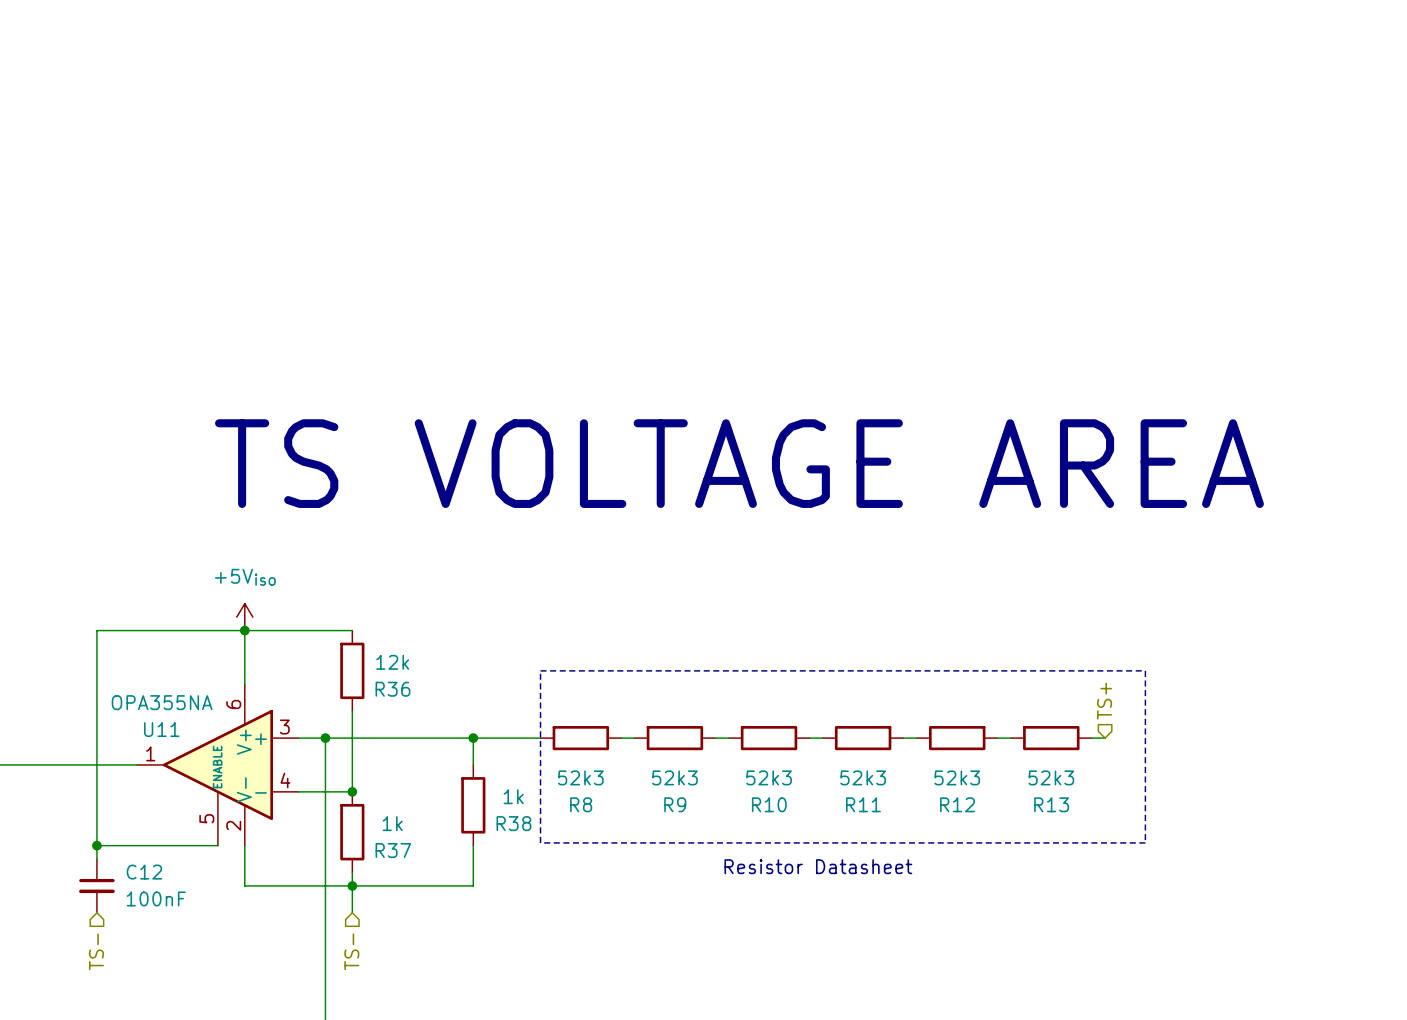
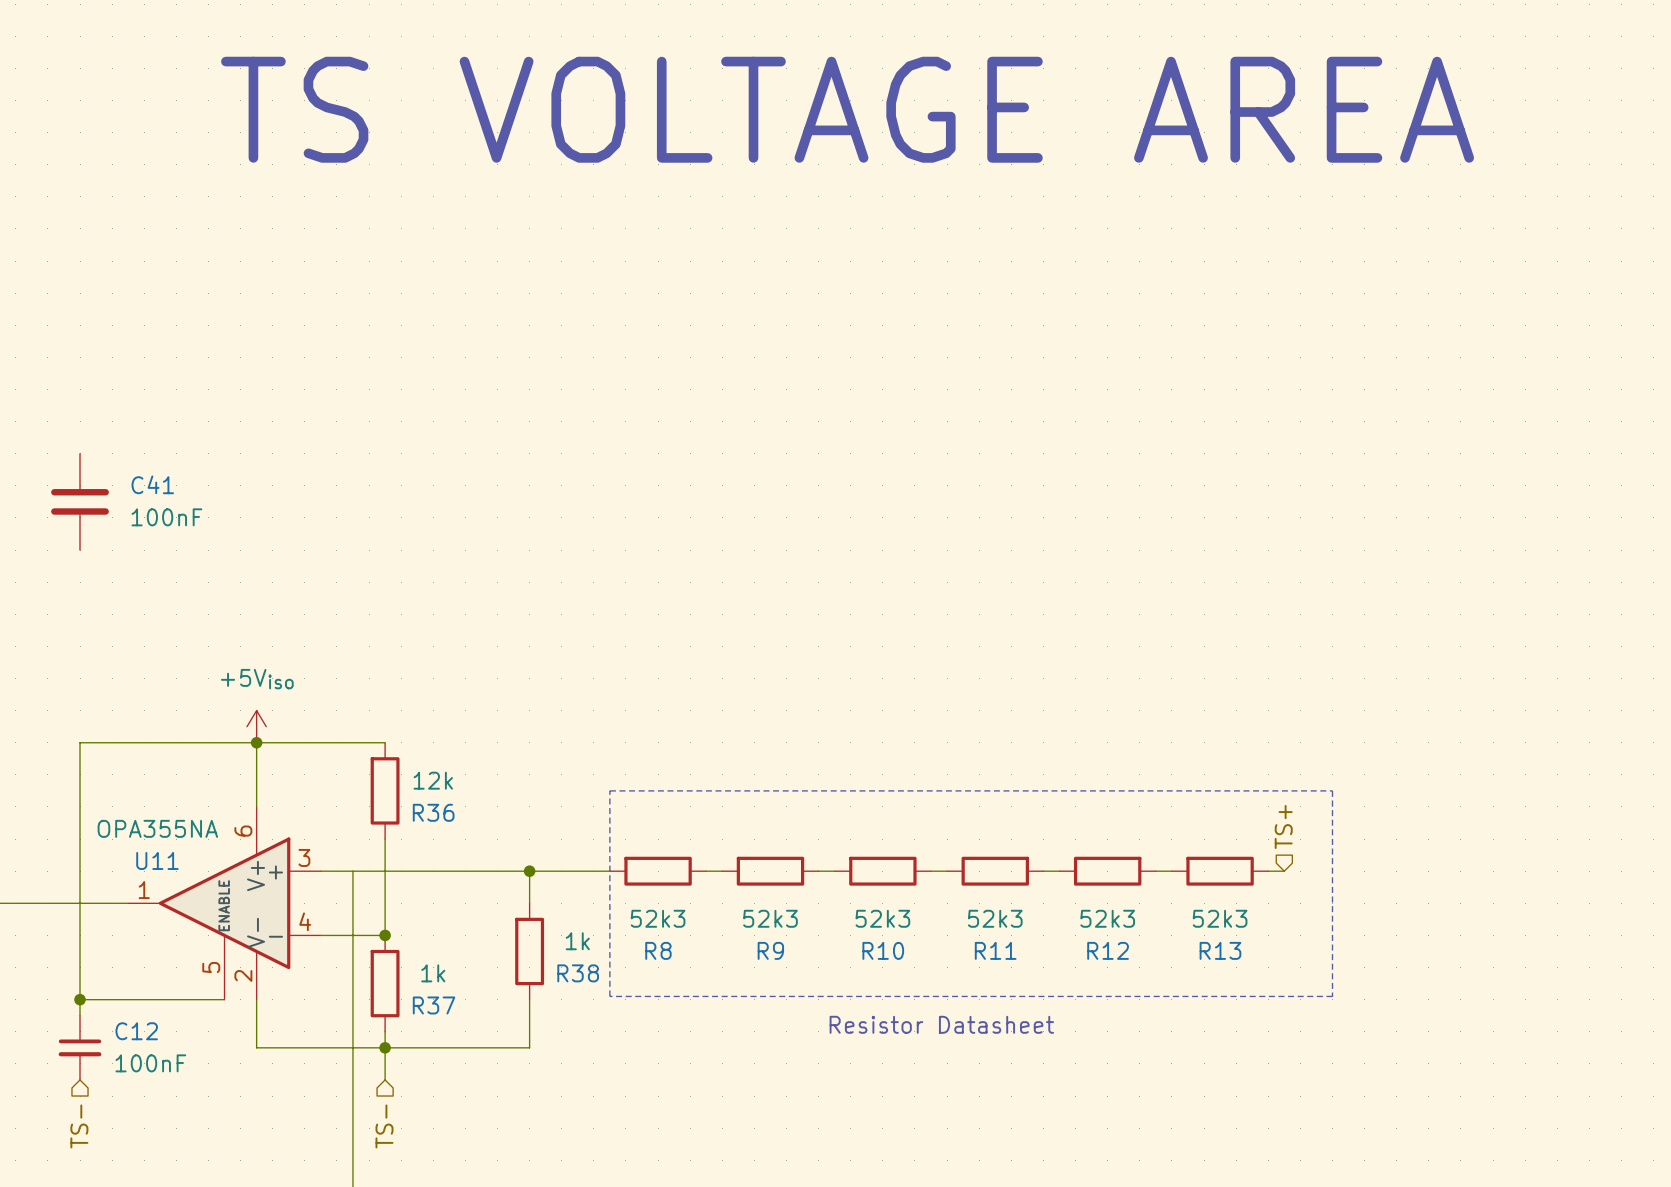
text: none -> TS VOLTAGE AREA (847, 109)
C41: none -> 100nF (80, 501)
text: TS VOLTAGE AREA (739, 463) -> none
junction: (325, 738) -> none

